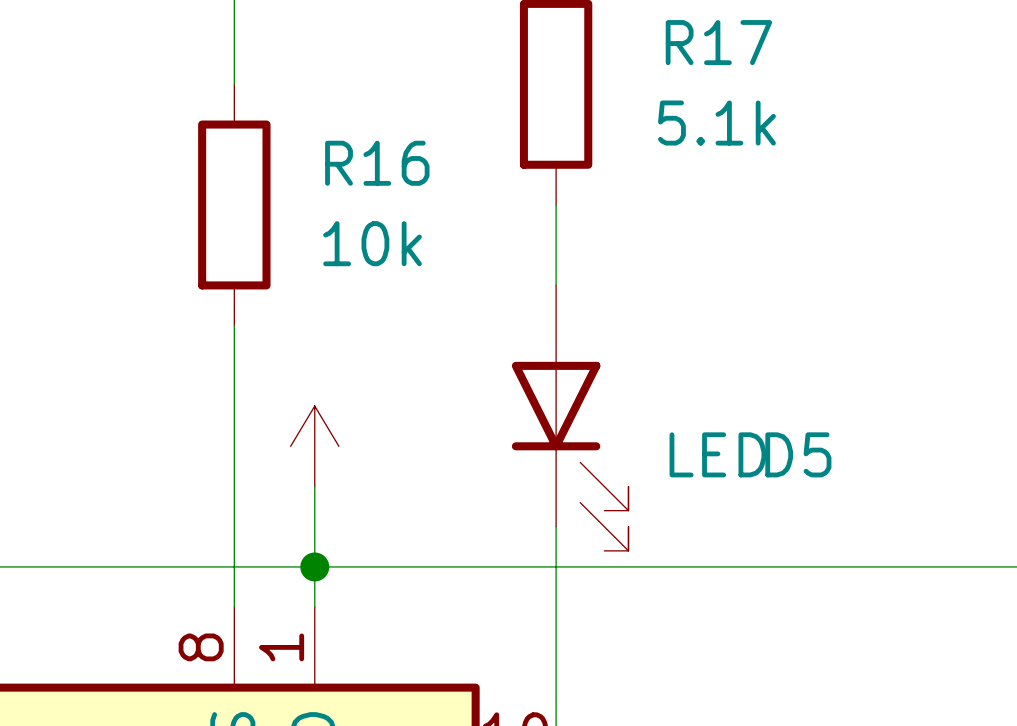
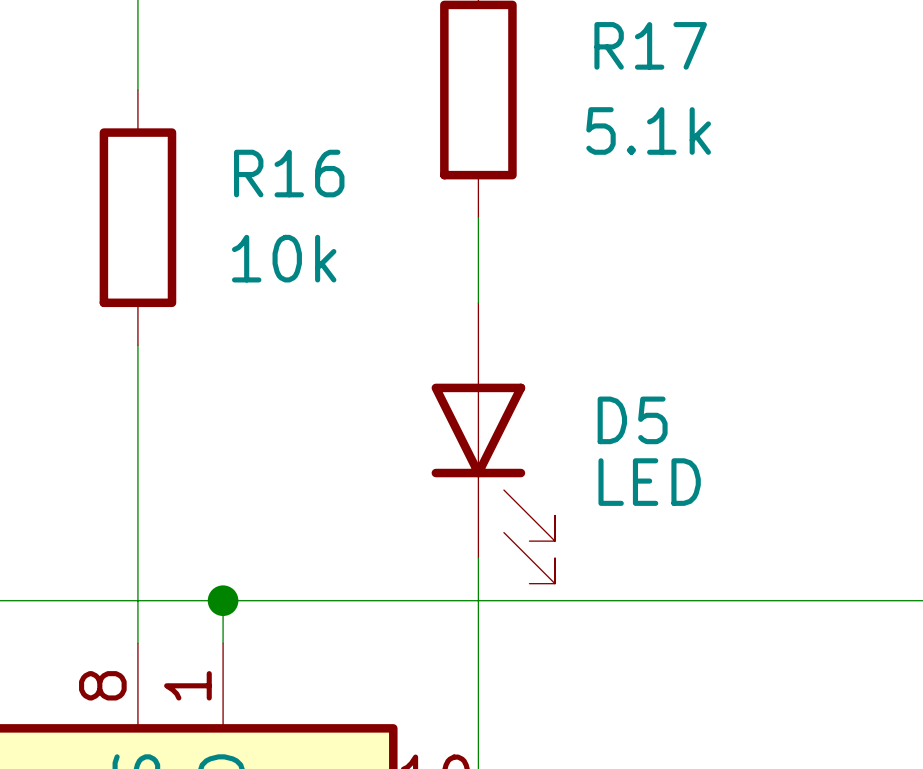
power symbol: (314, 446) -> none
D5 name position: D5 (798, 454) -> D5 (632, 420)
wire: (314, 486) (314, 566) -> none

